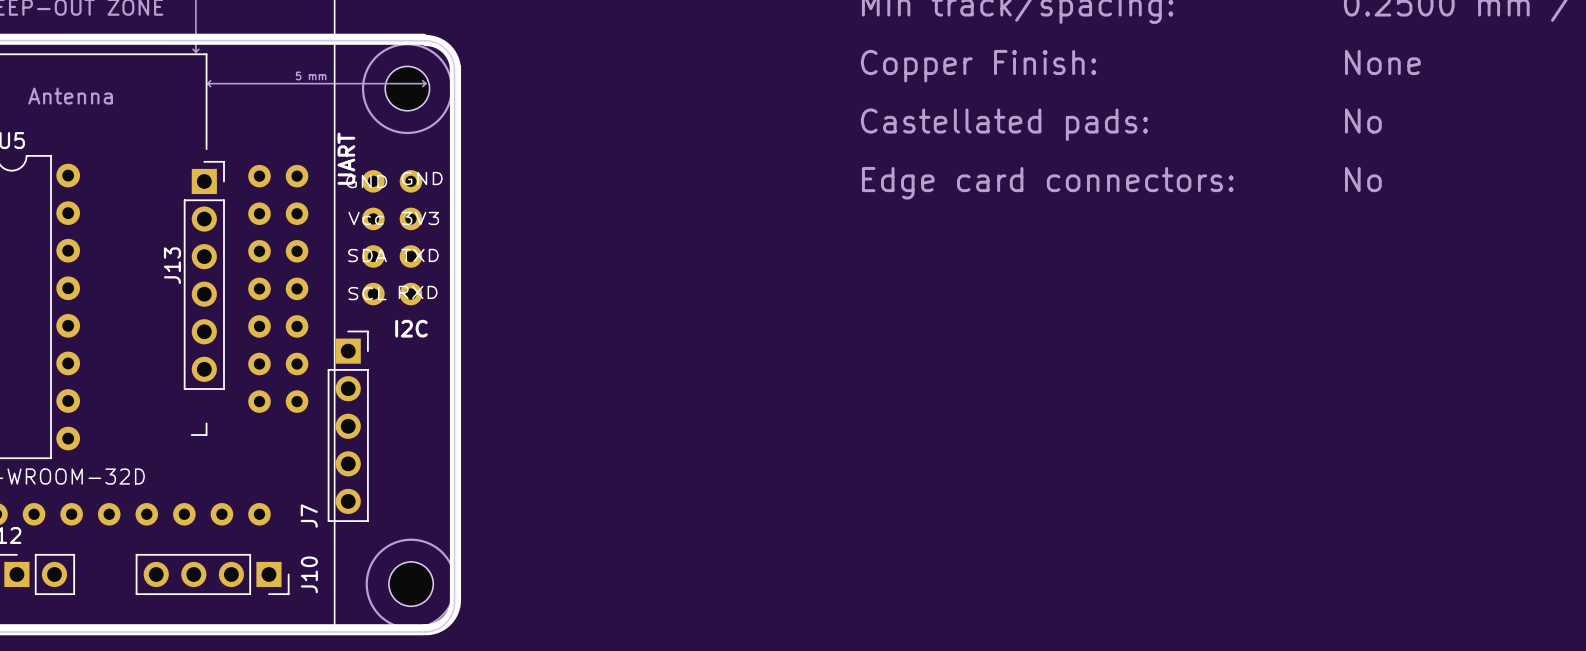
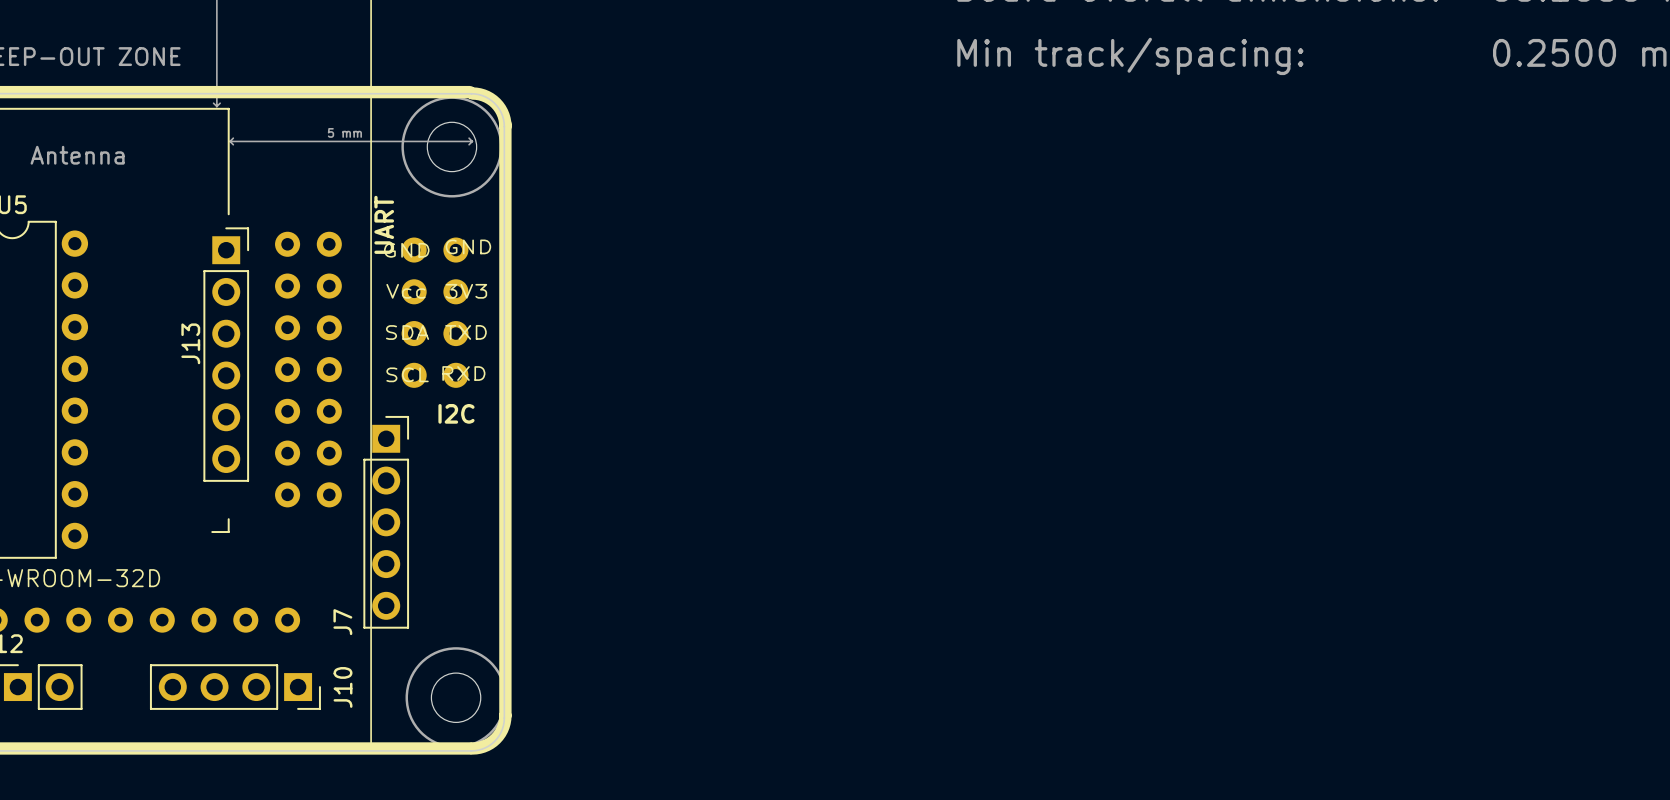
text: None (1382, 62) -> none
text: Copper Finish: (978, 66) -> none
text: No (1363, 121) -> none
text: Castellated pads: (1004, 124) -> none
text: No (1363, 179) -> none
text: Edge card connectors: (1047, 183) -> none

